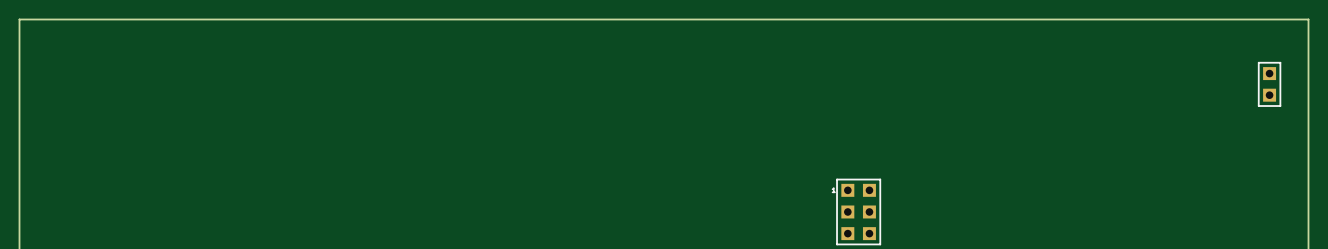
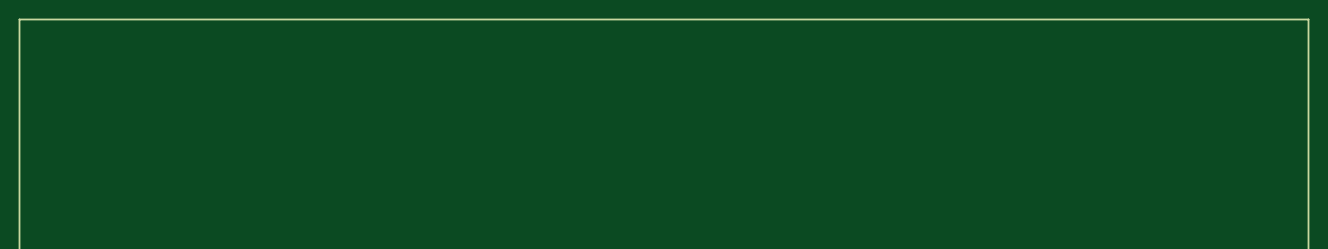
part: (1269, 84) -> none
part: (858, 211) -> none

